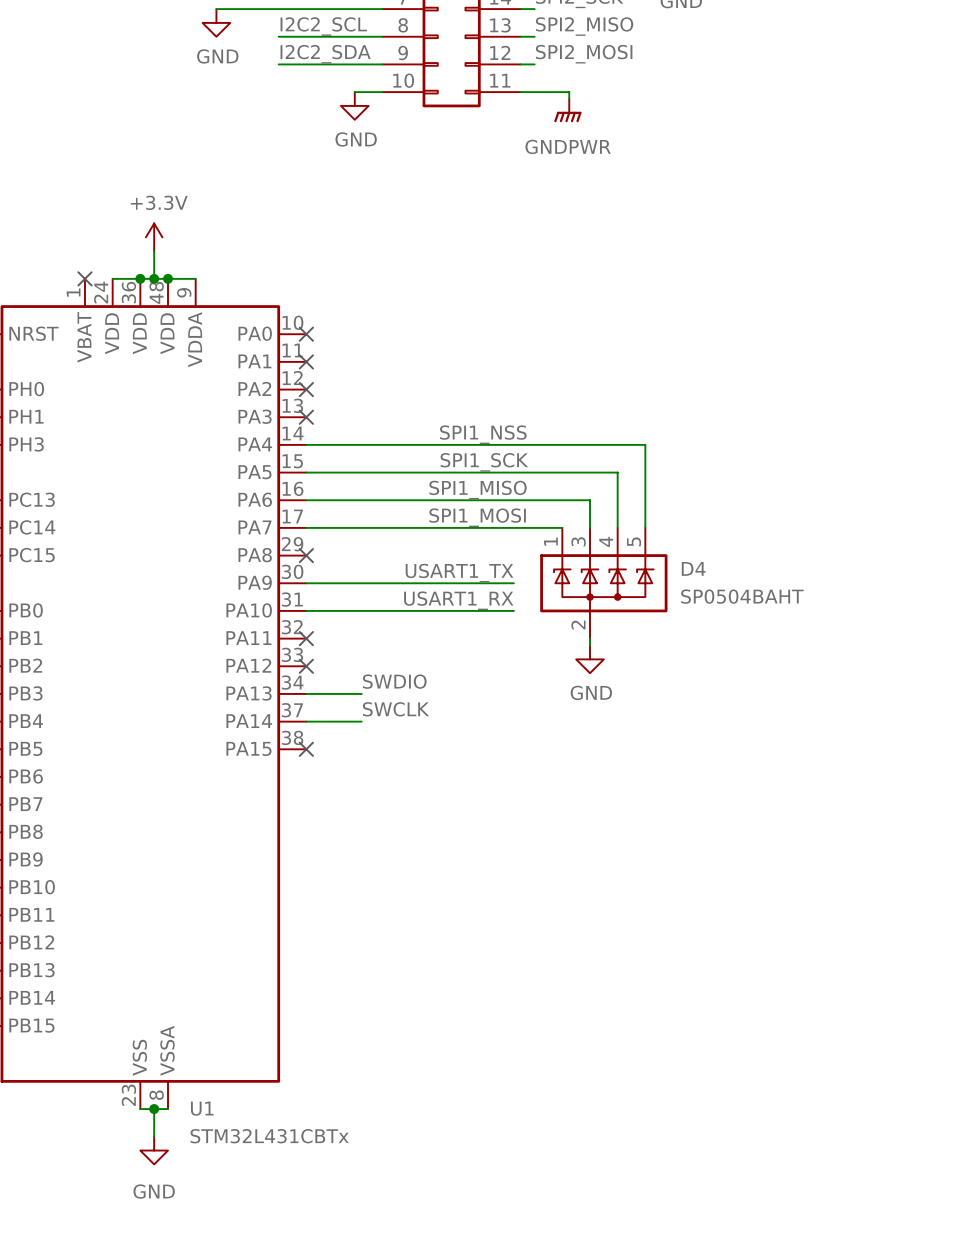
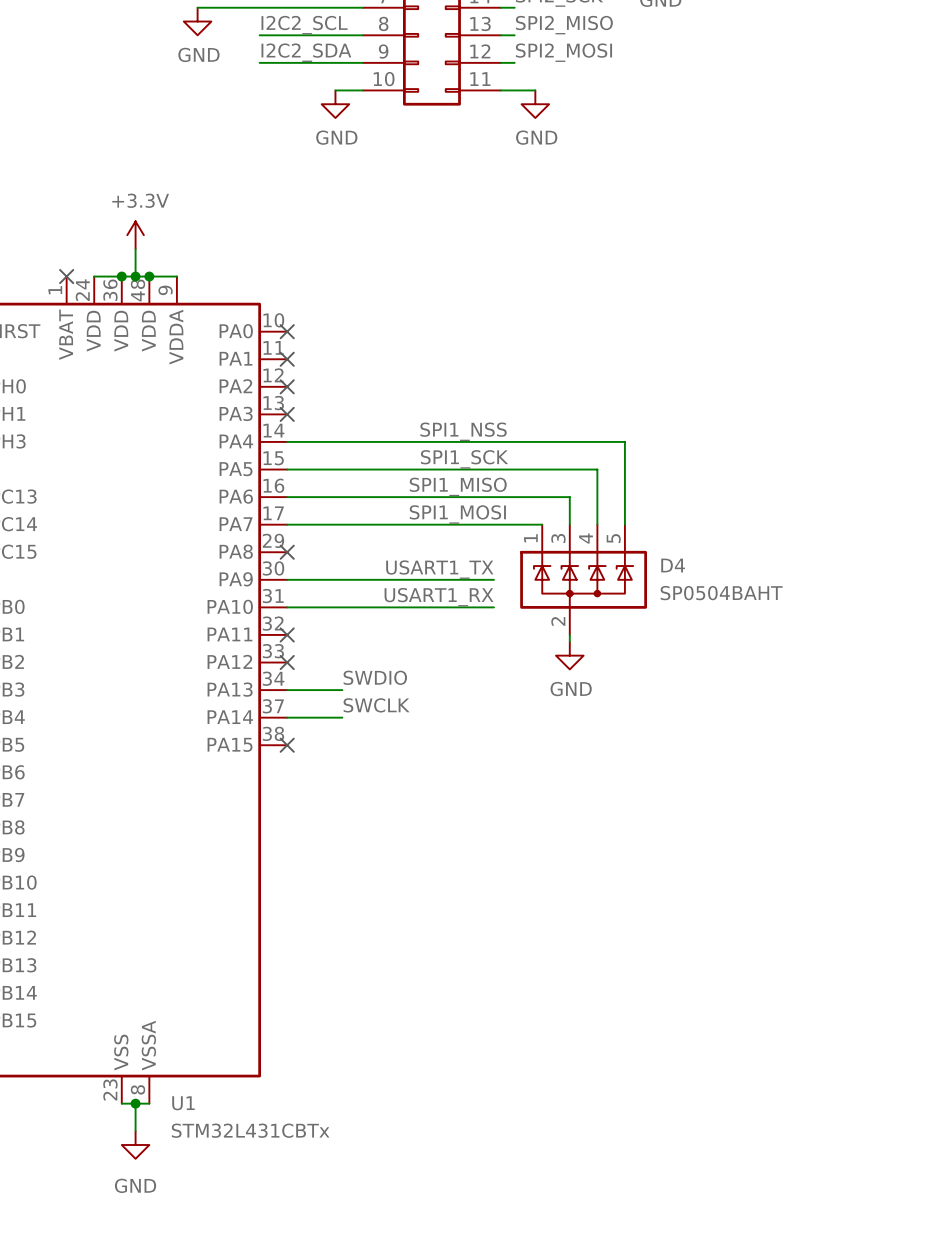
wire: (555, 92) (569, 92) (569, 99) -> none
power symbol: none -> GND (535, 104)
power symbol: GNDPWR (567, 110) -> none

